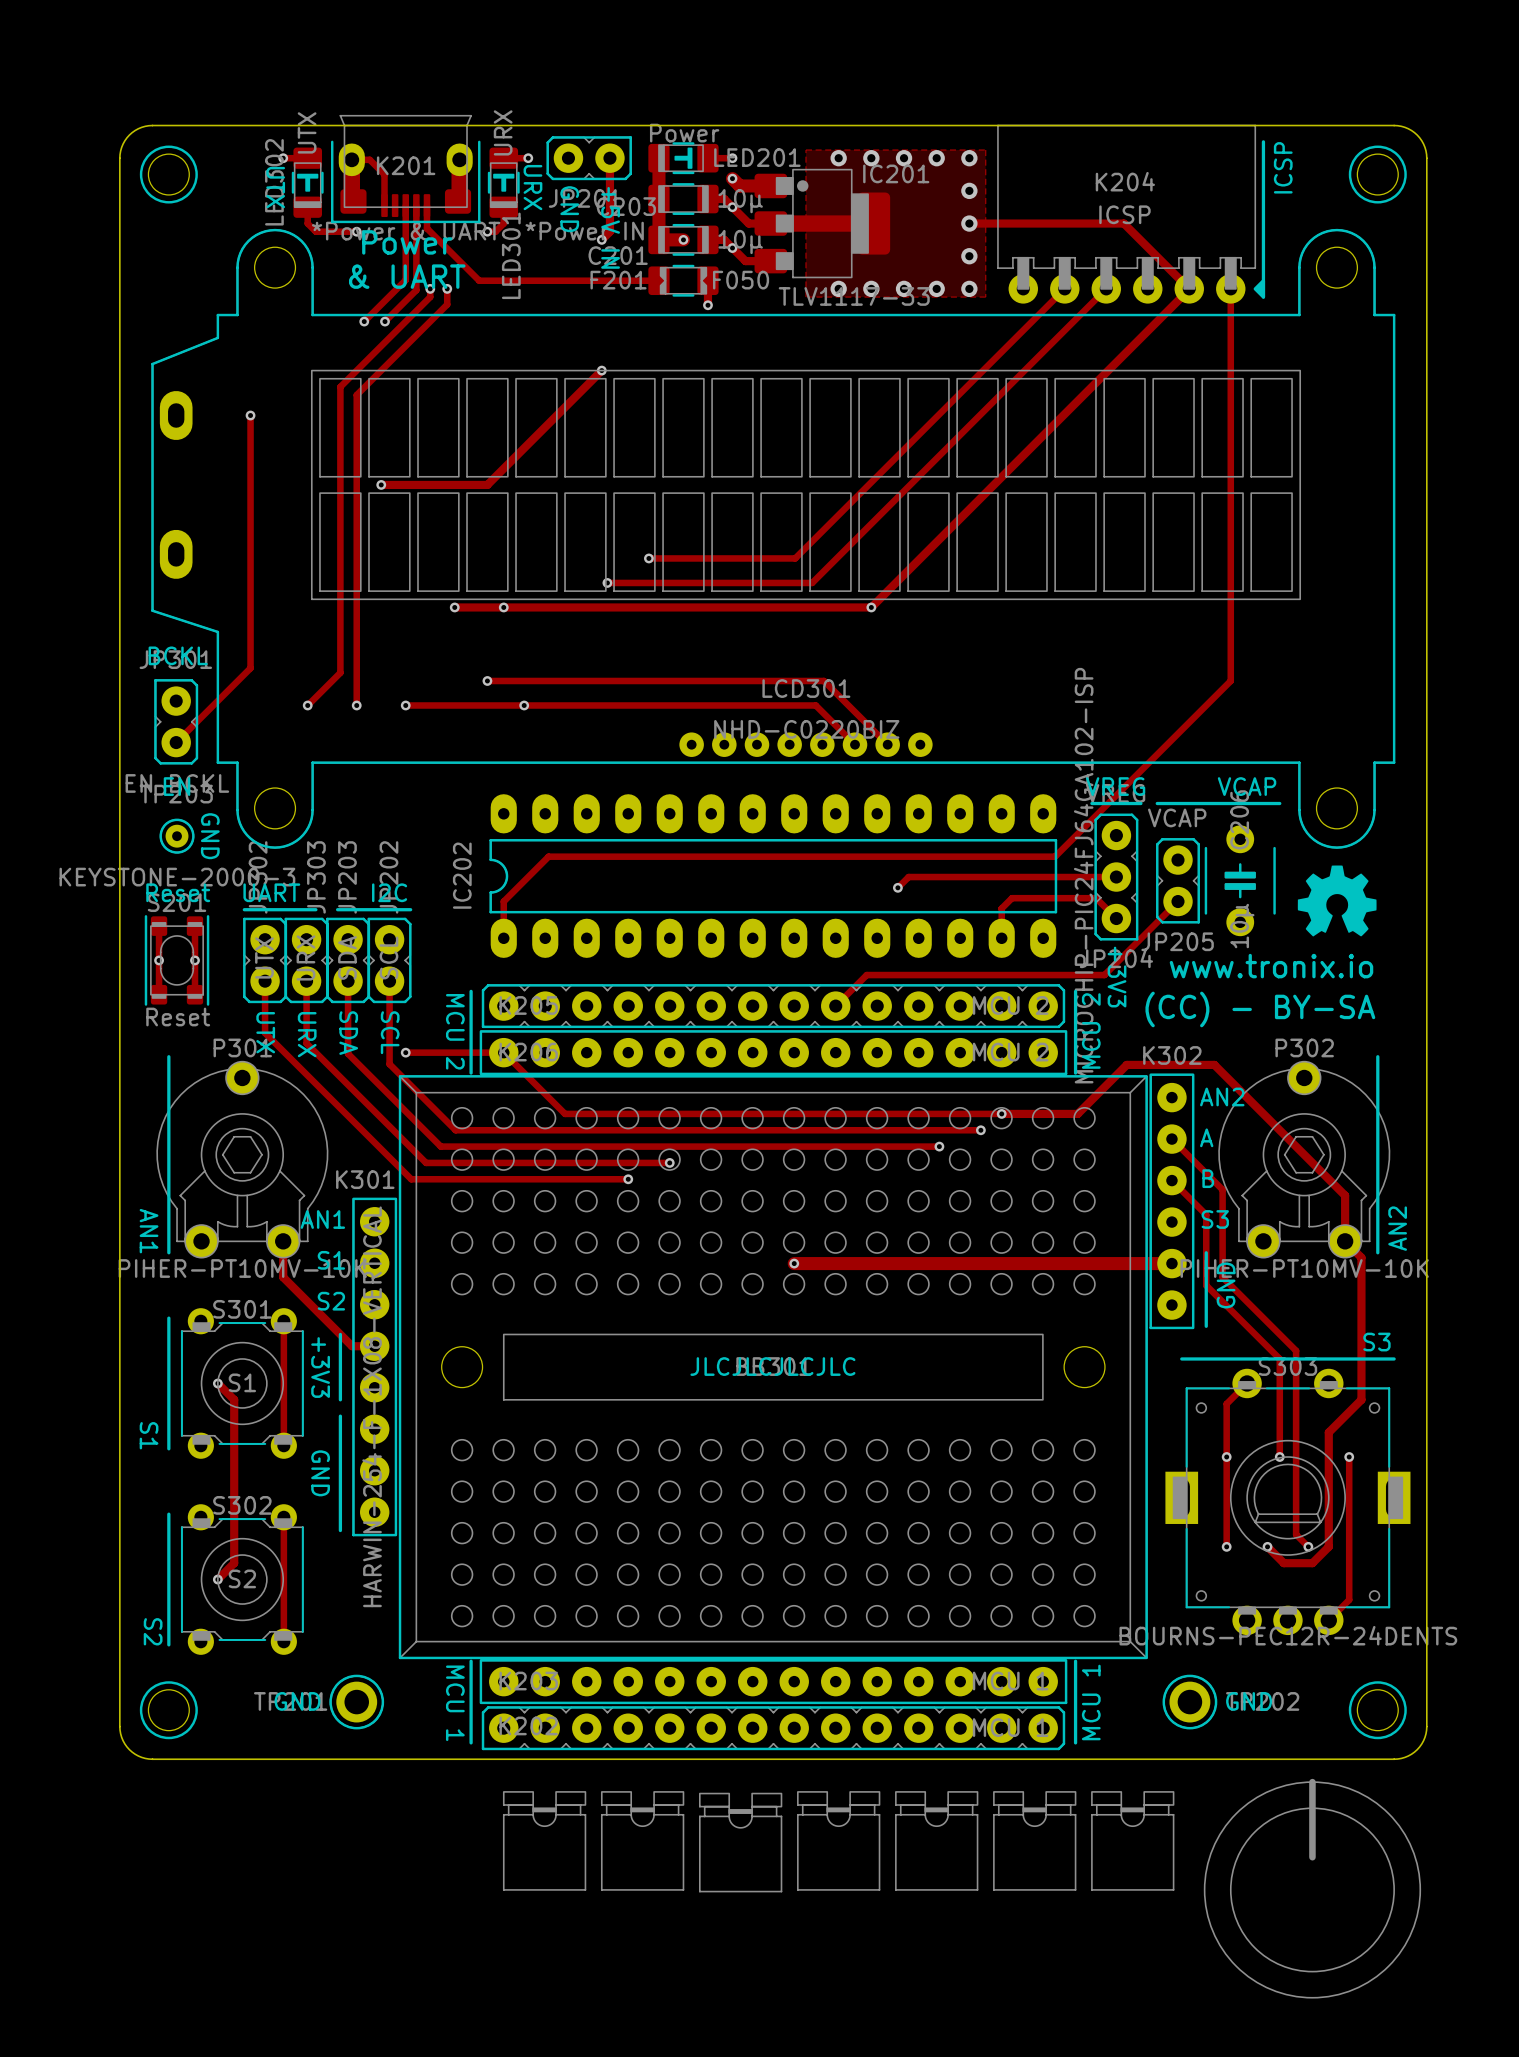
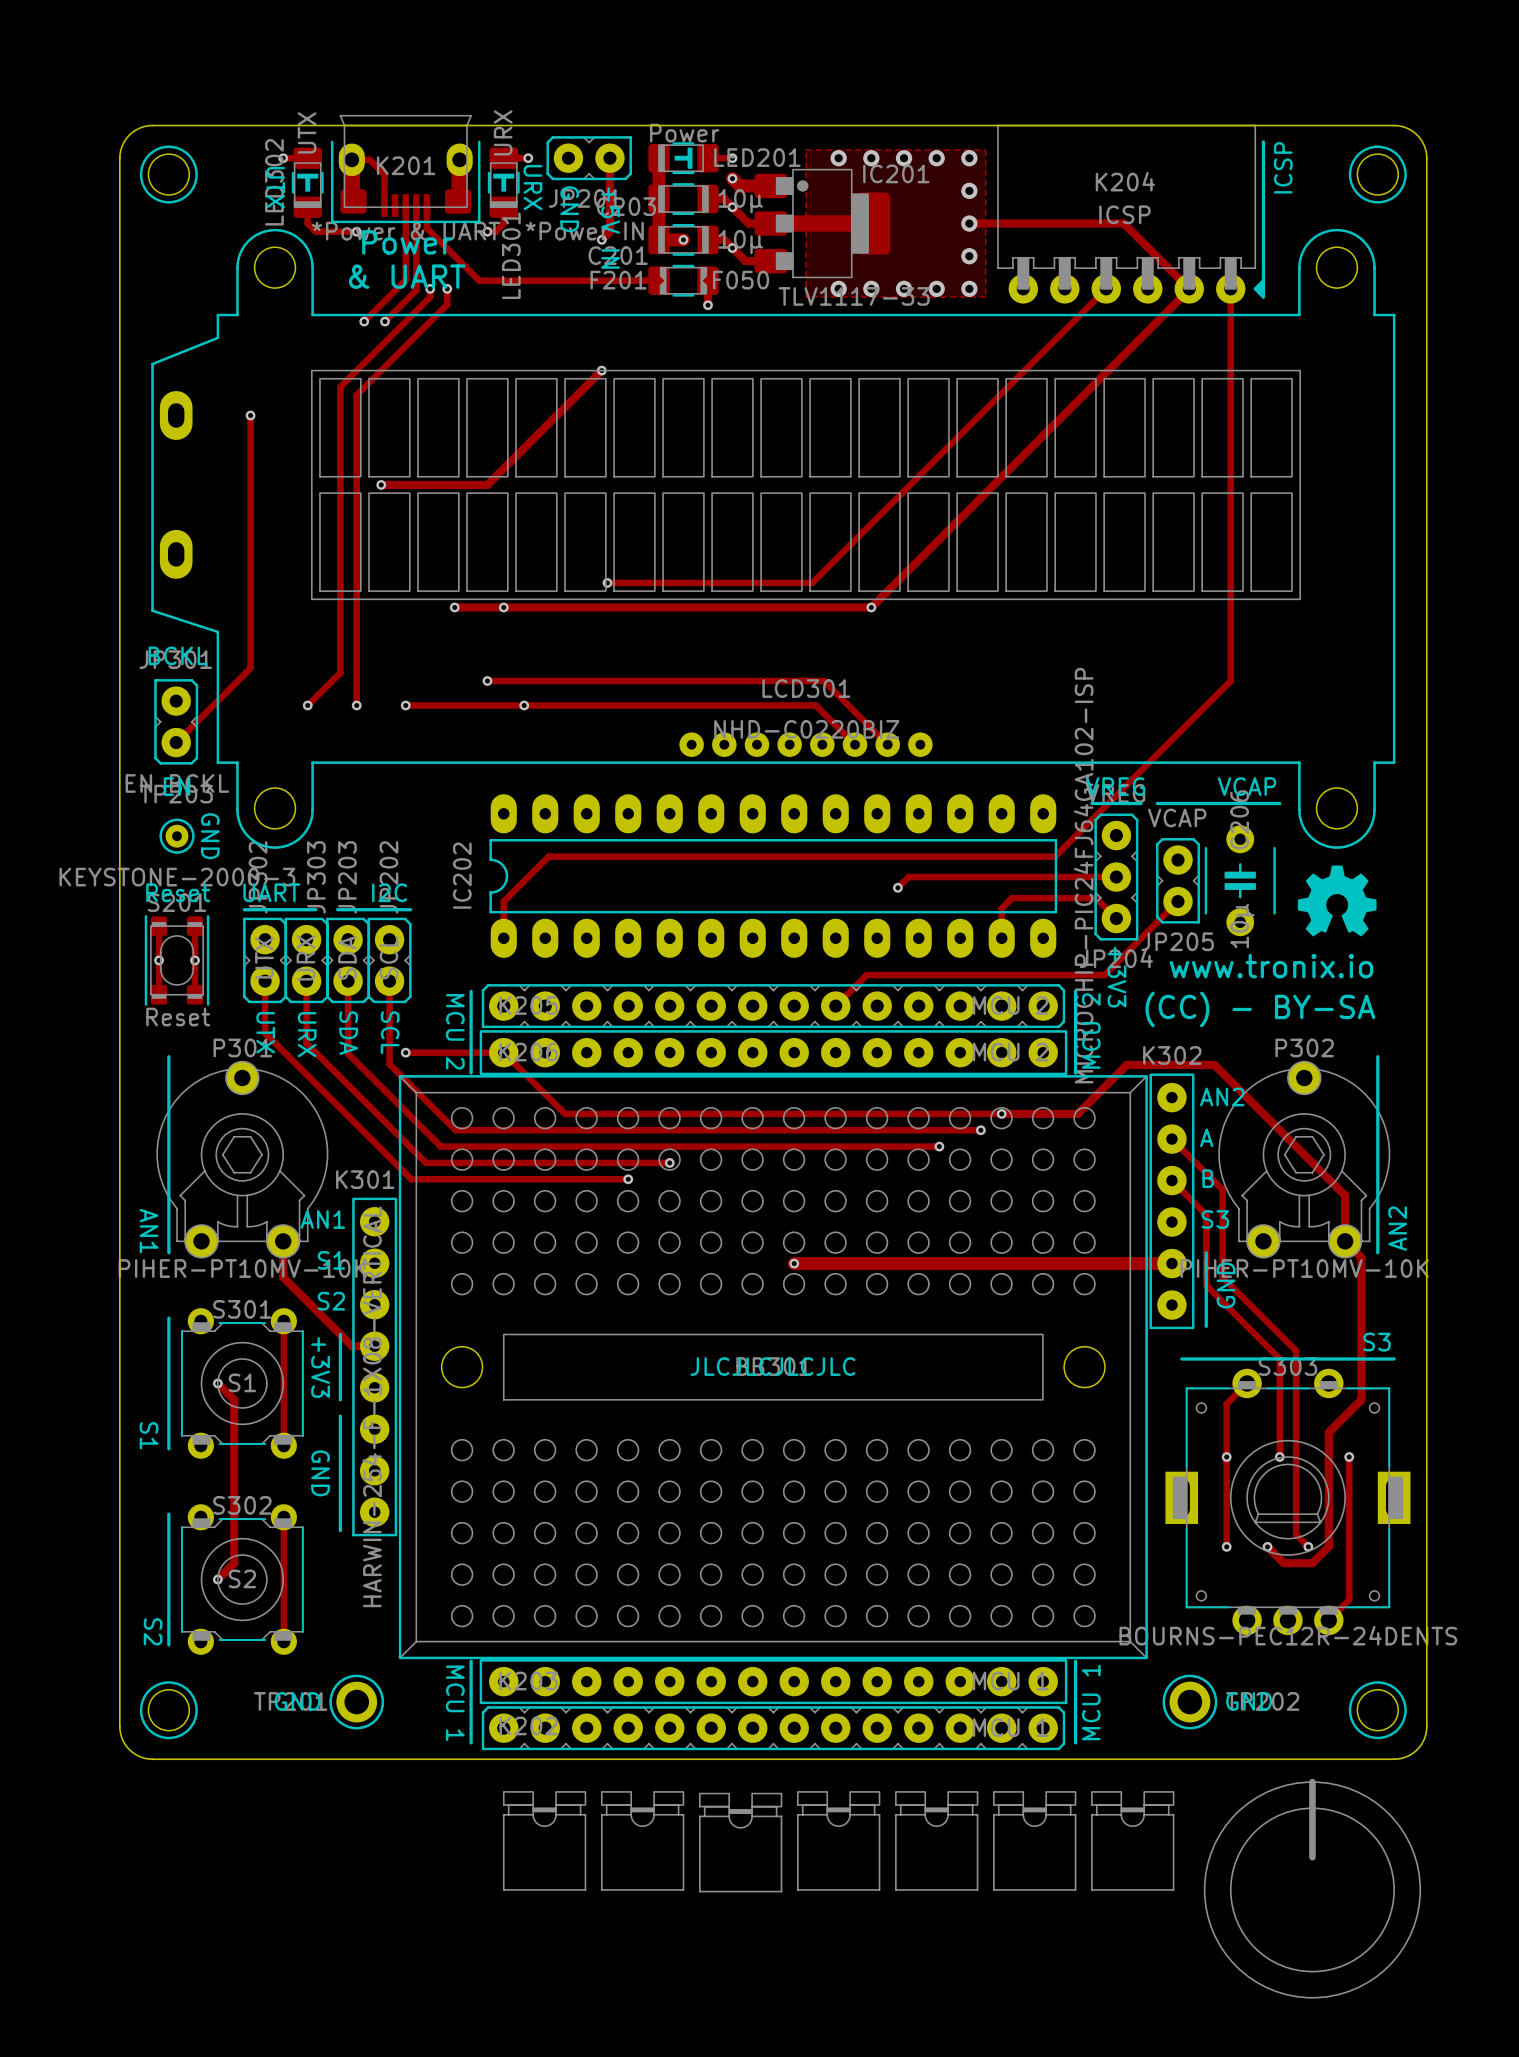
track: (1064, 288) (795, 558) (648, 558) -> none
via: (648, 558) -> none

